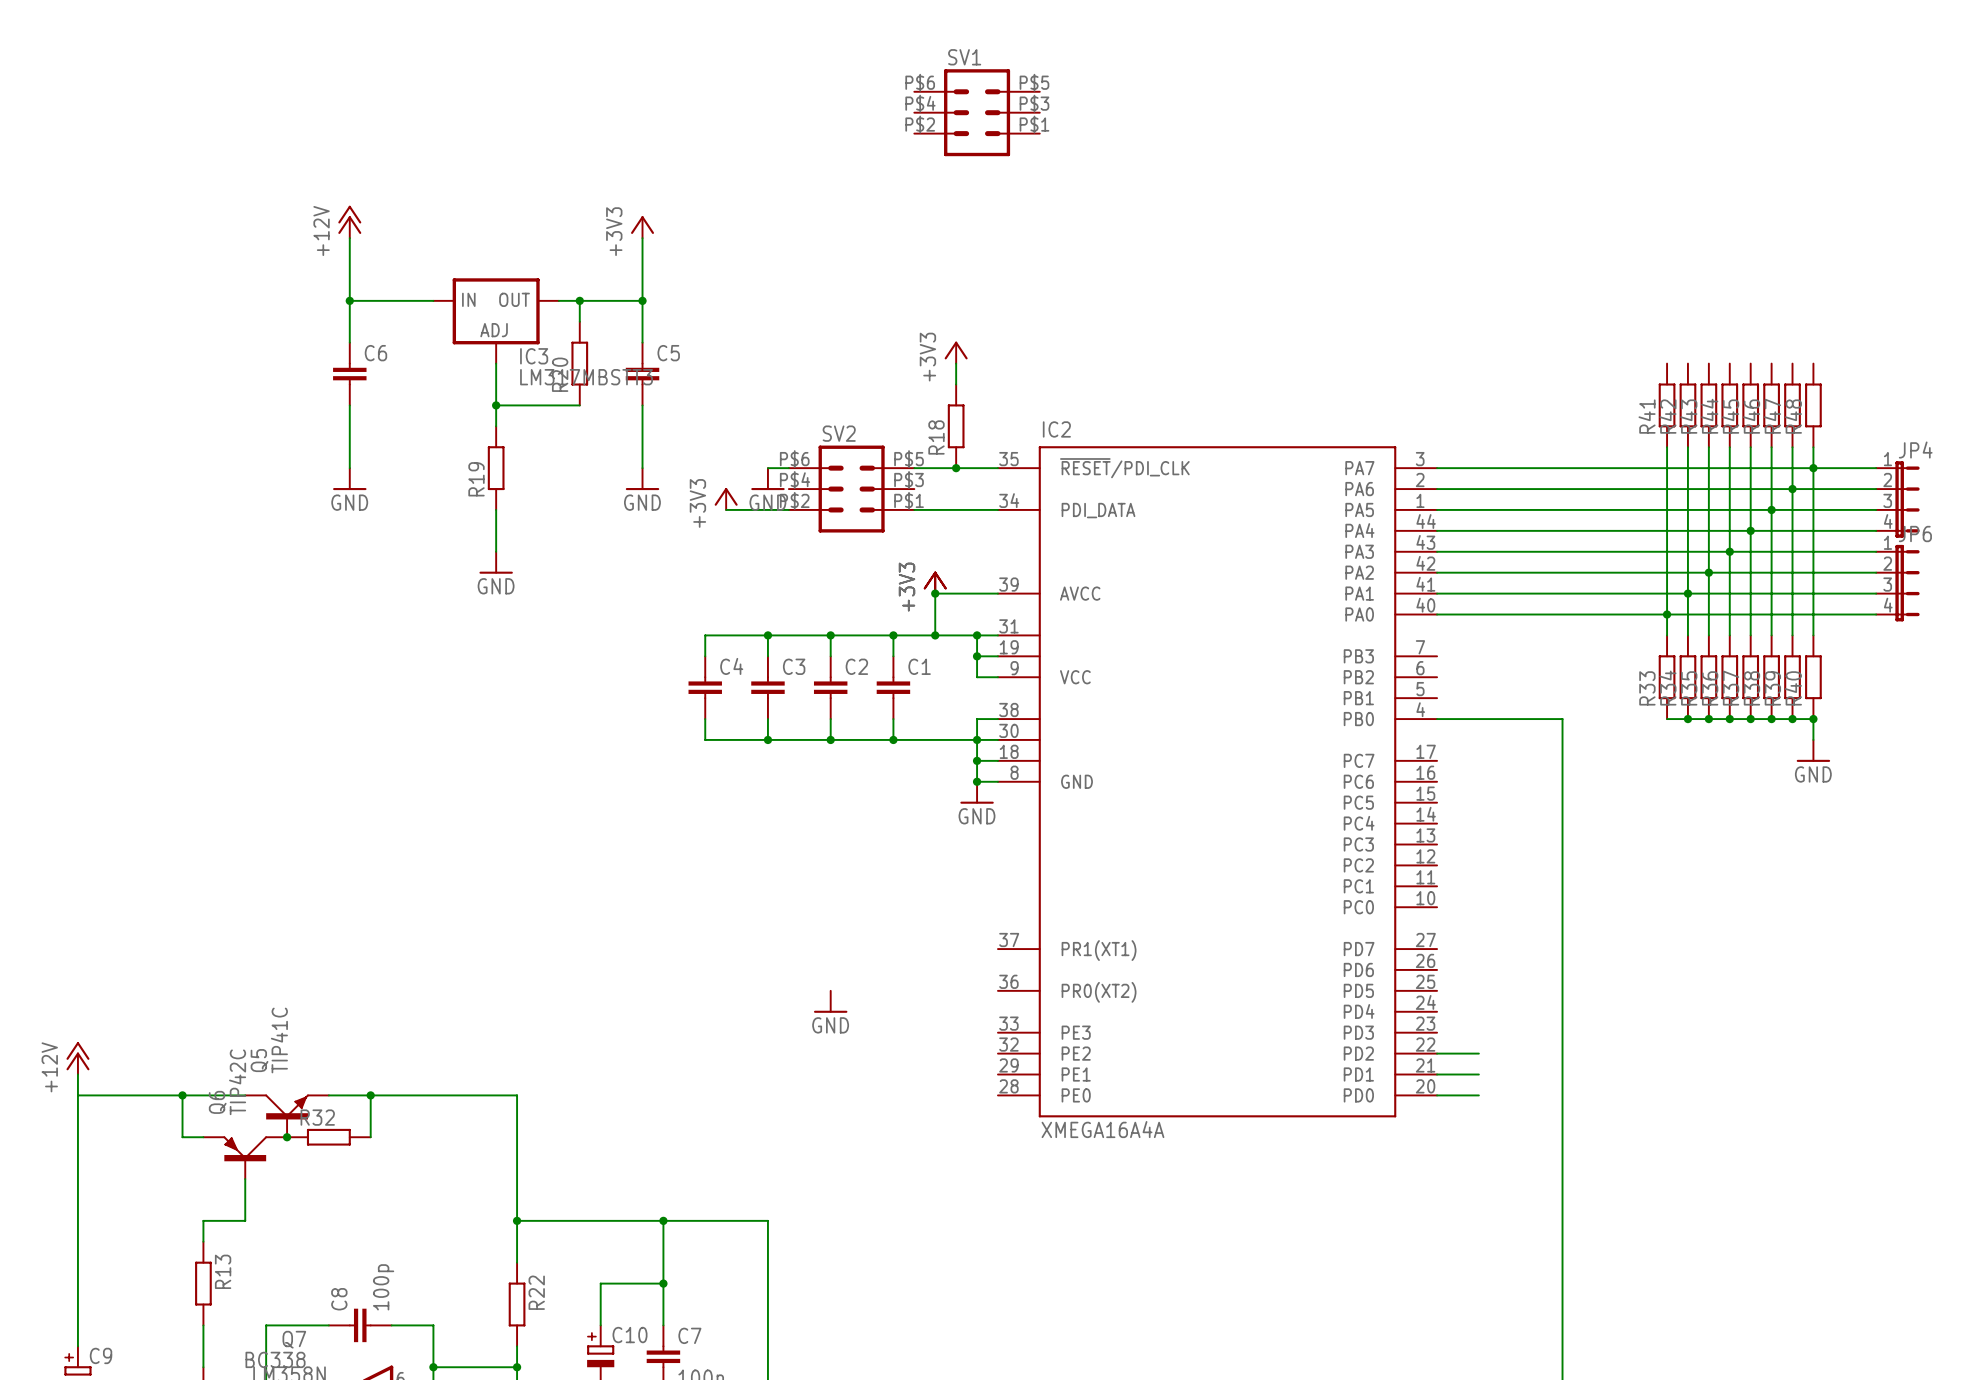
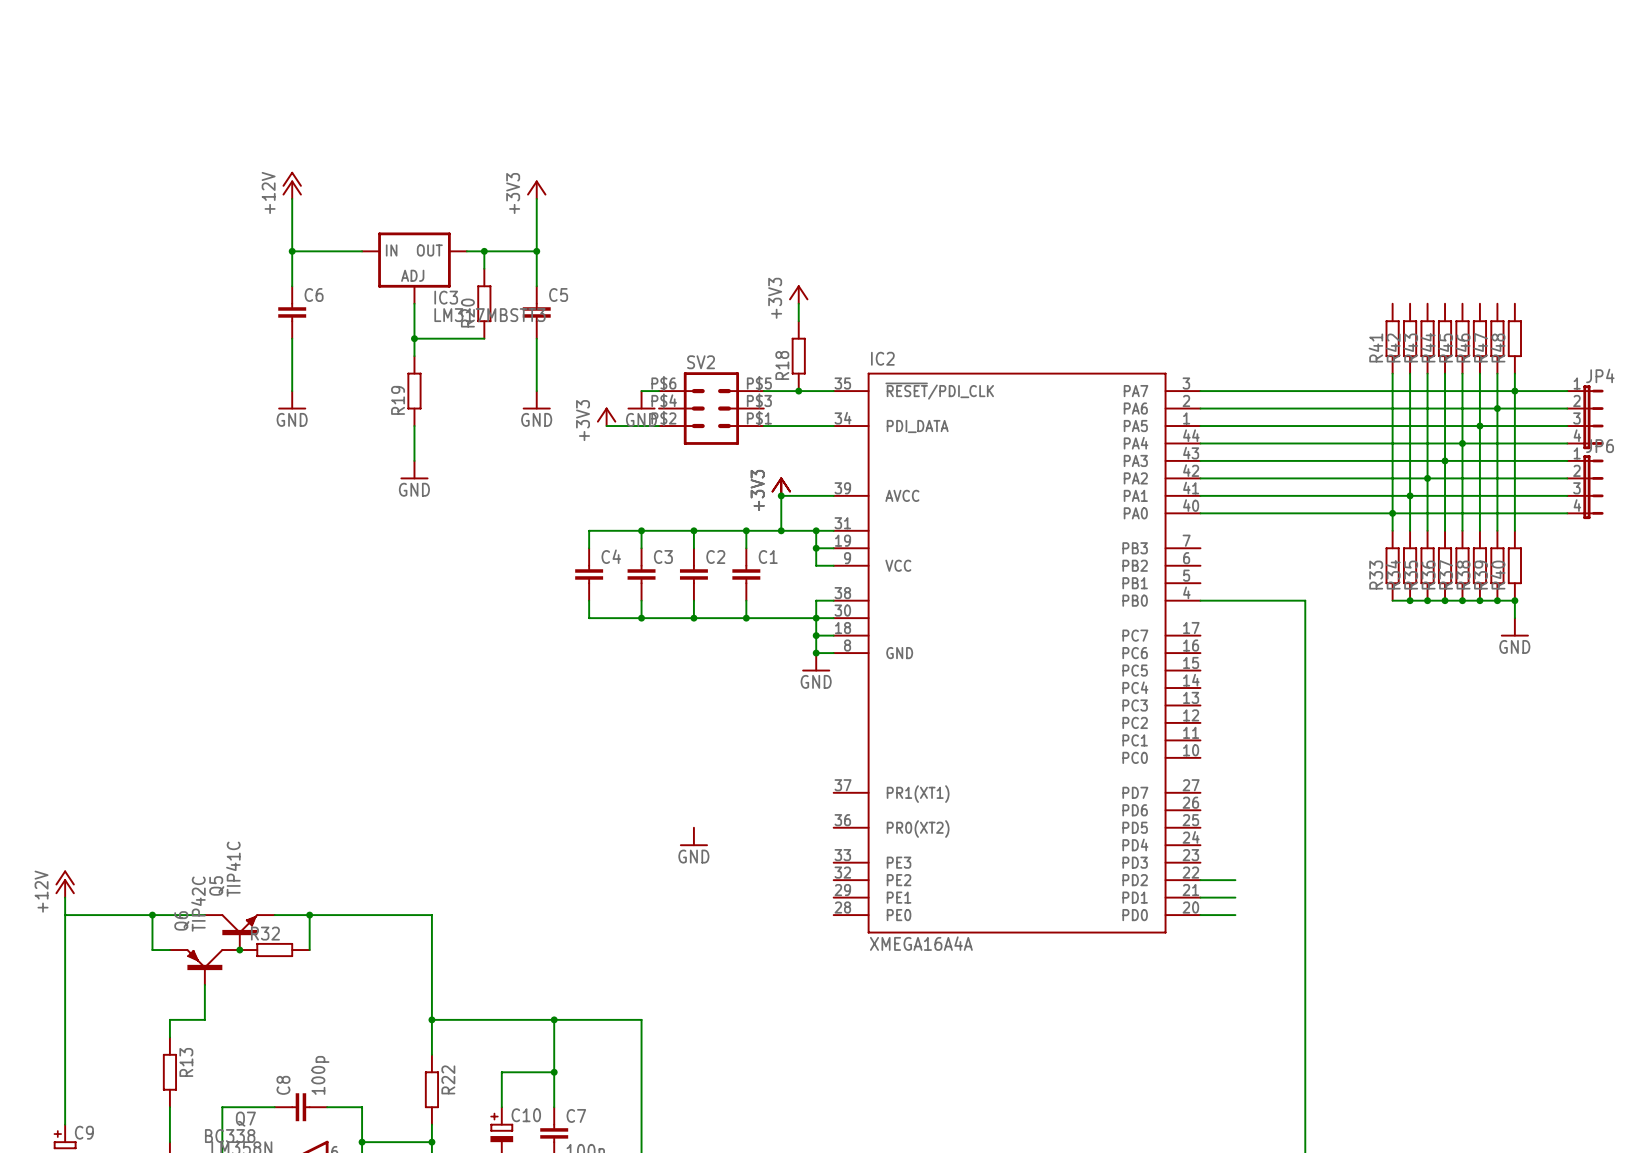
SV1: (977, 112) -> none

